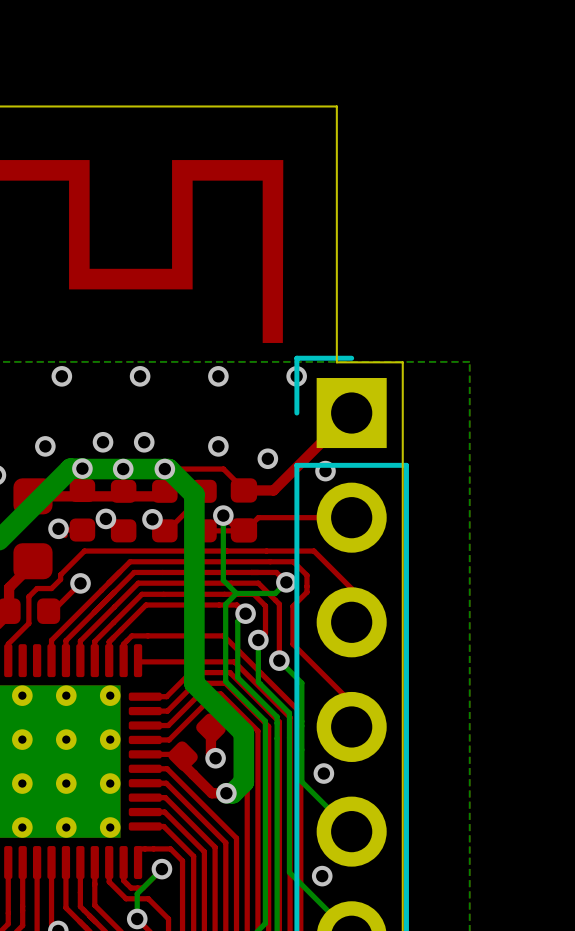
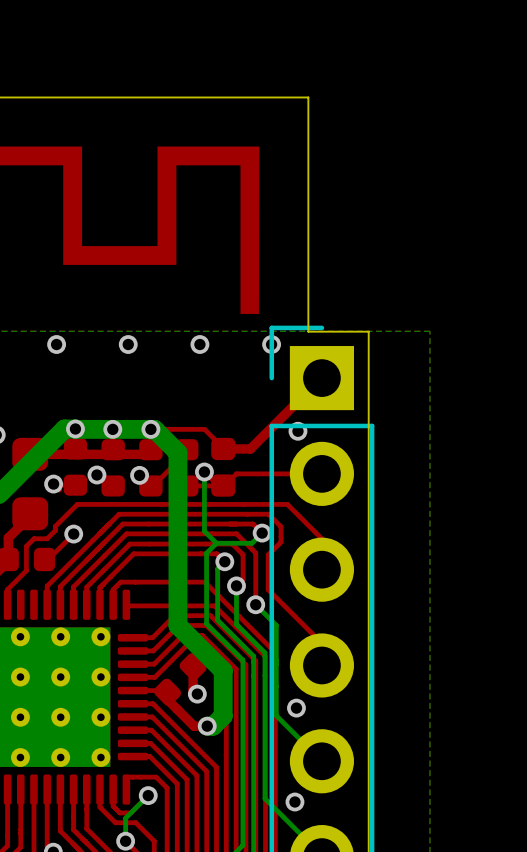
via: (103, 442) -> none
via: (144, 442) -> none
via: (45, 446) -> none
via: (218, 446) -> none
via: (267, 458) -> none

